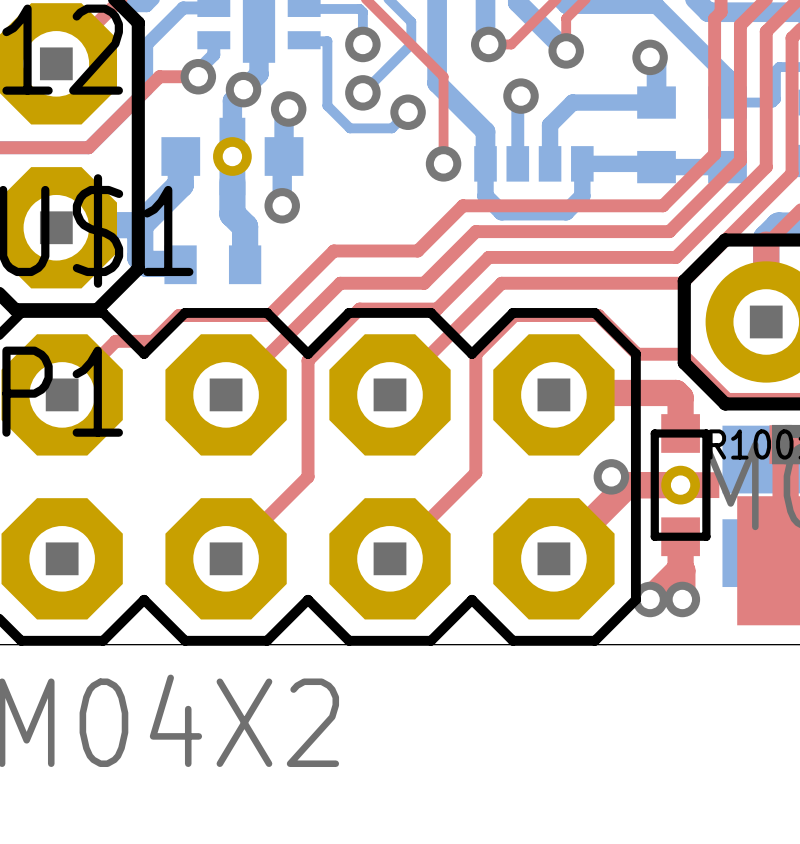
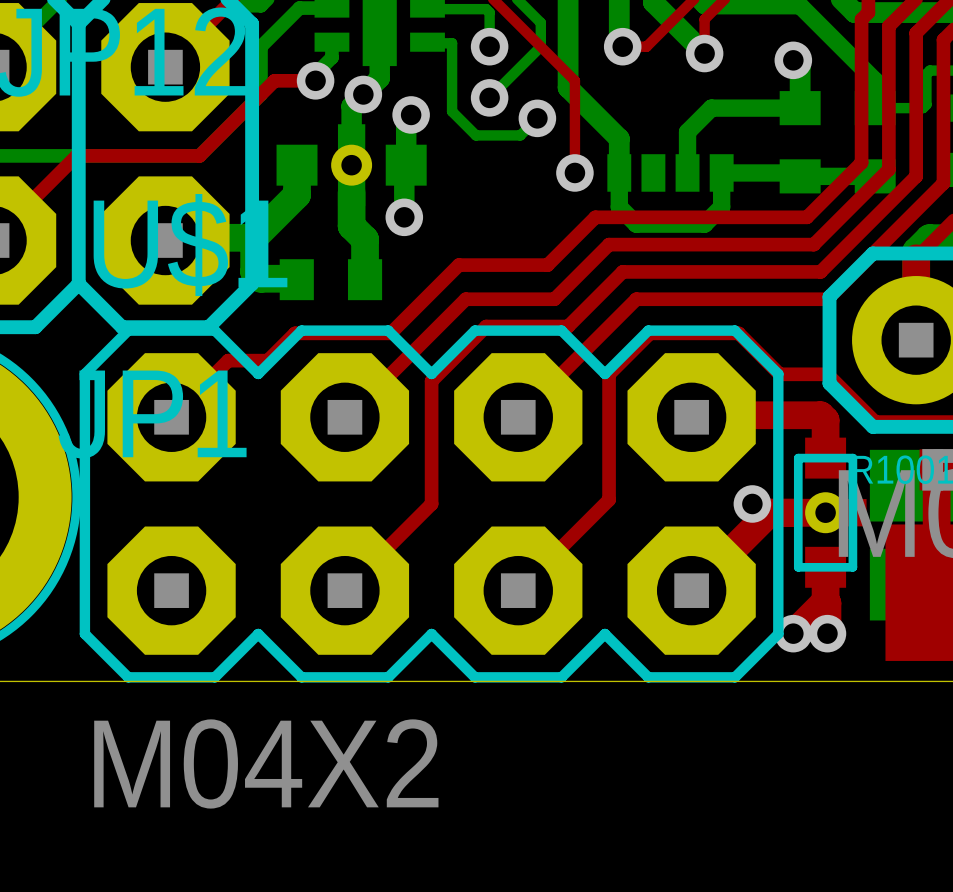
bottom track: (521, 96) (517, 99) (517, 163) -> none
via: (521, 96) -> none

